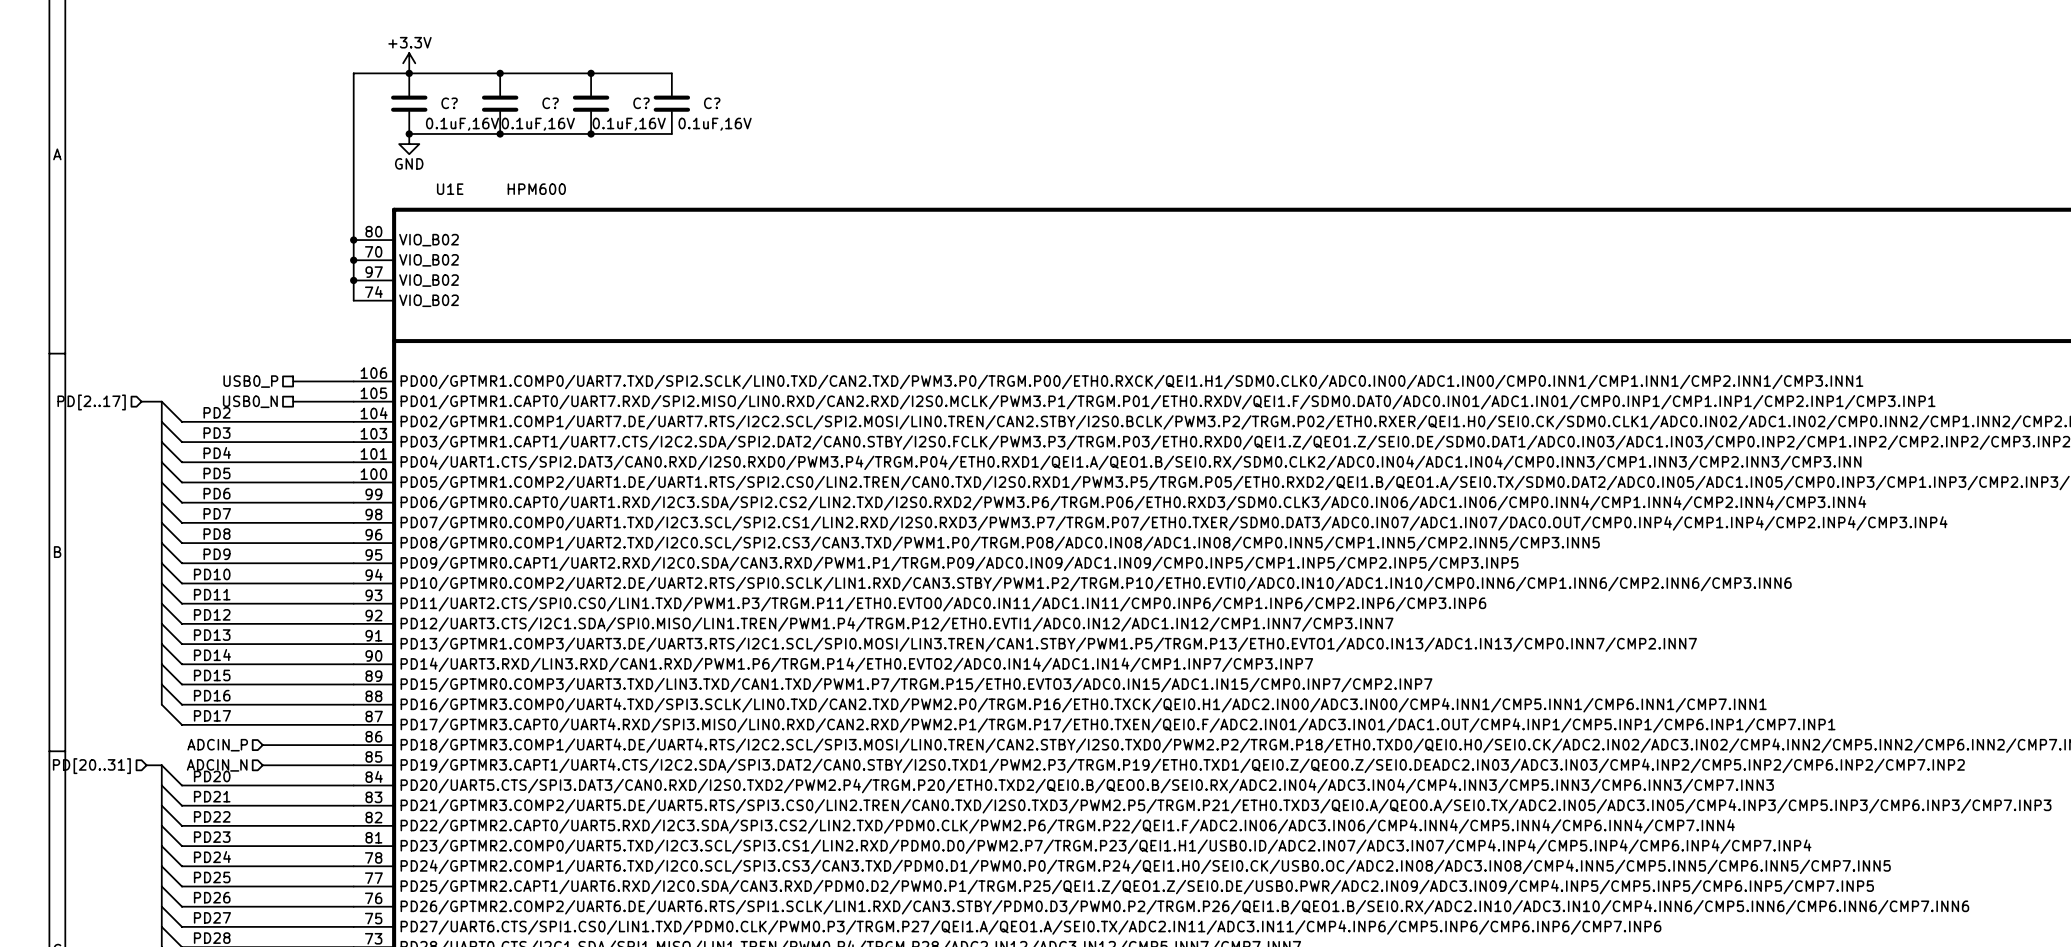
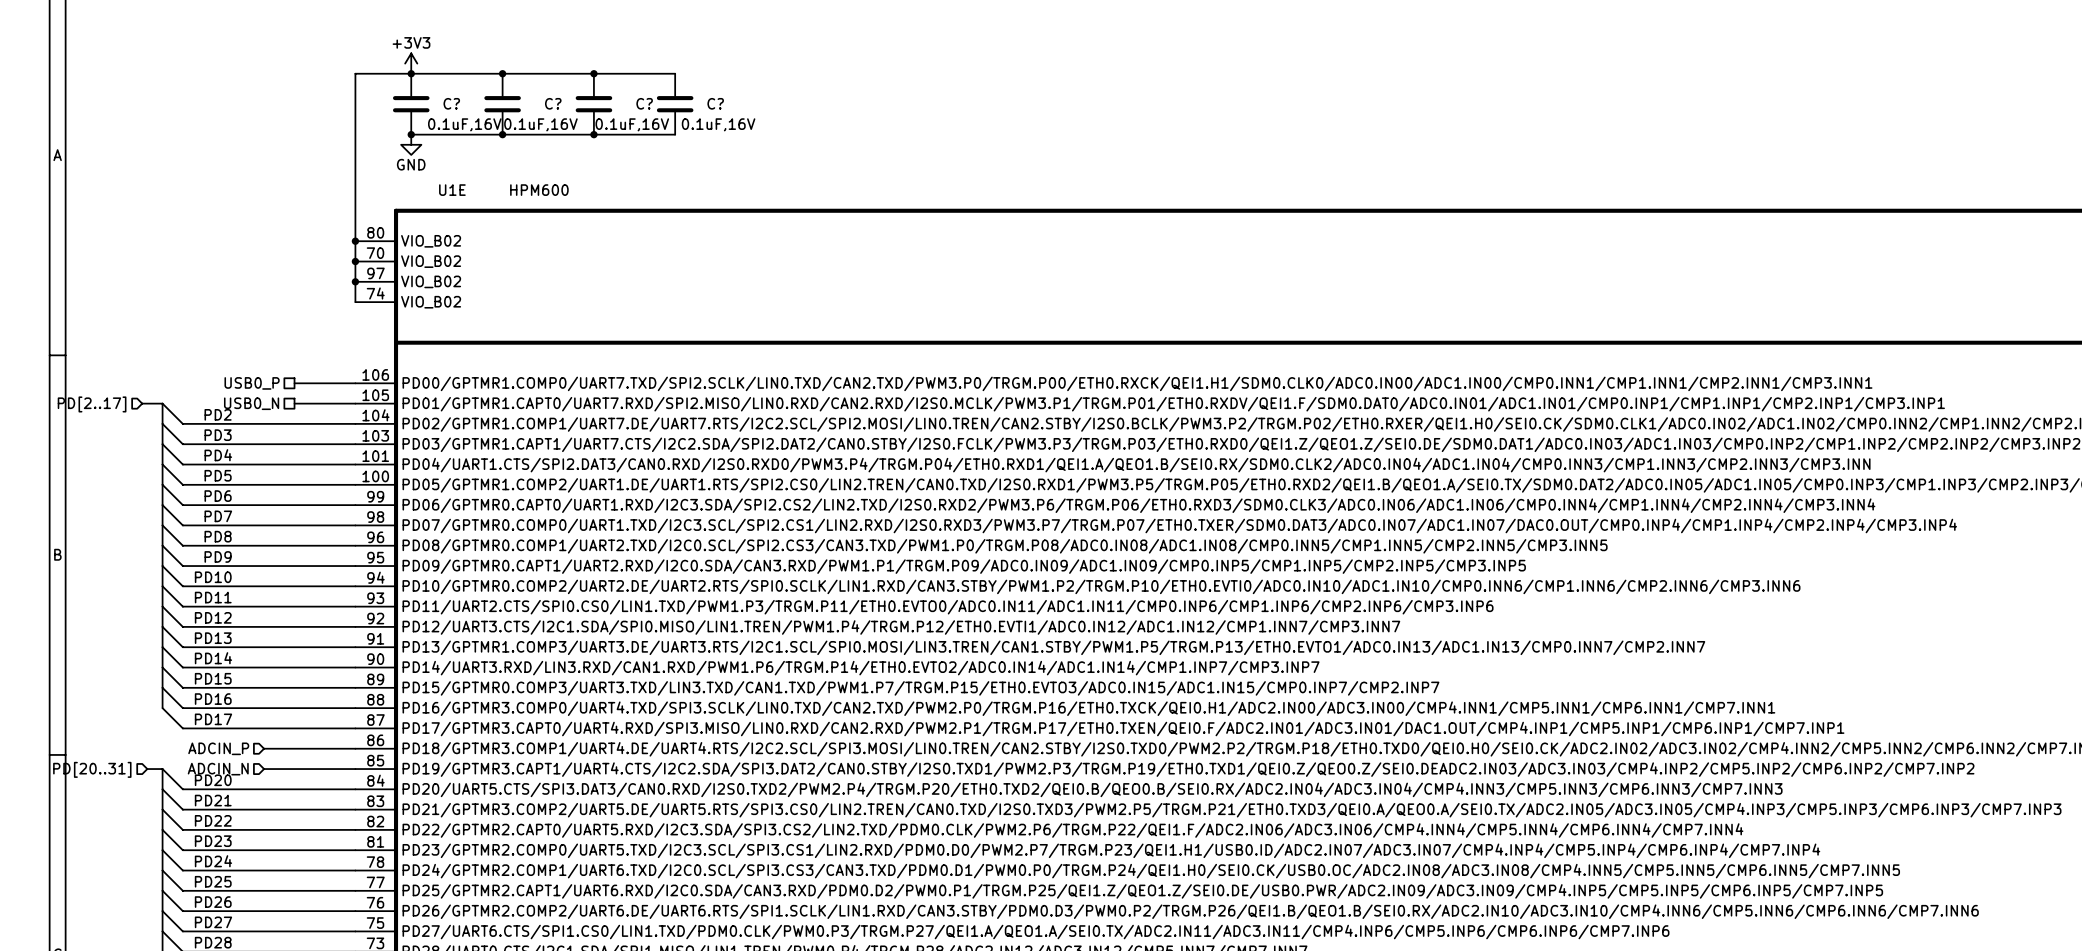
power symbol: +3.3V (409, 63) -> +3V3 (411, 63)

